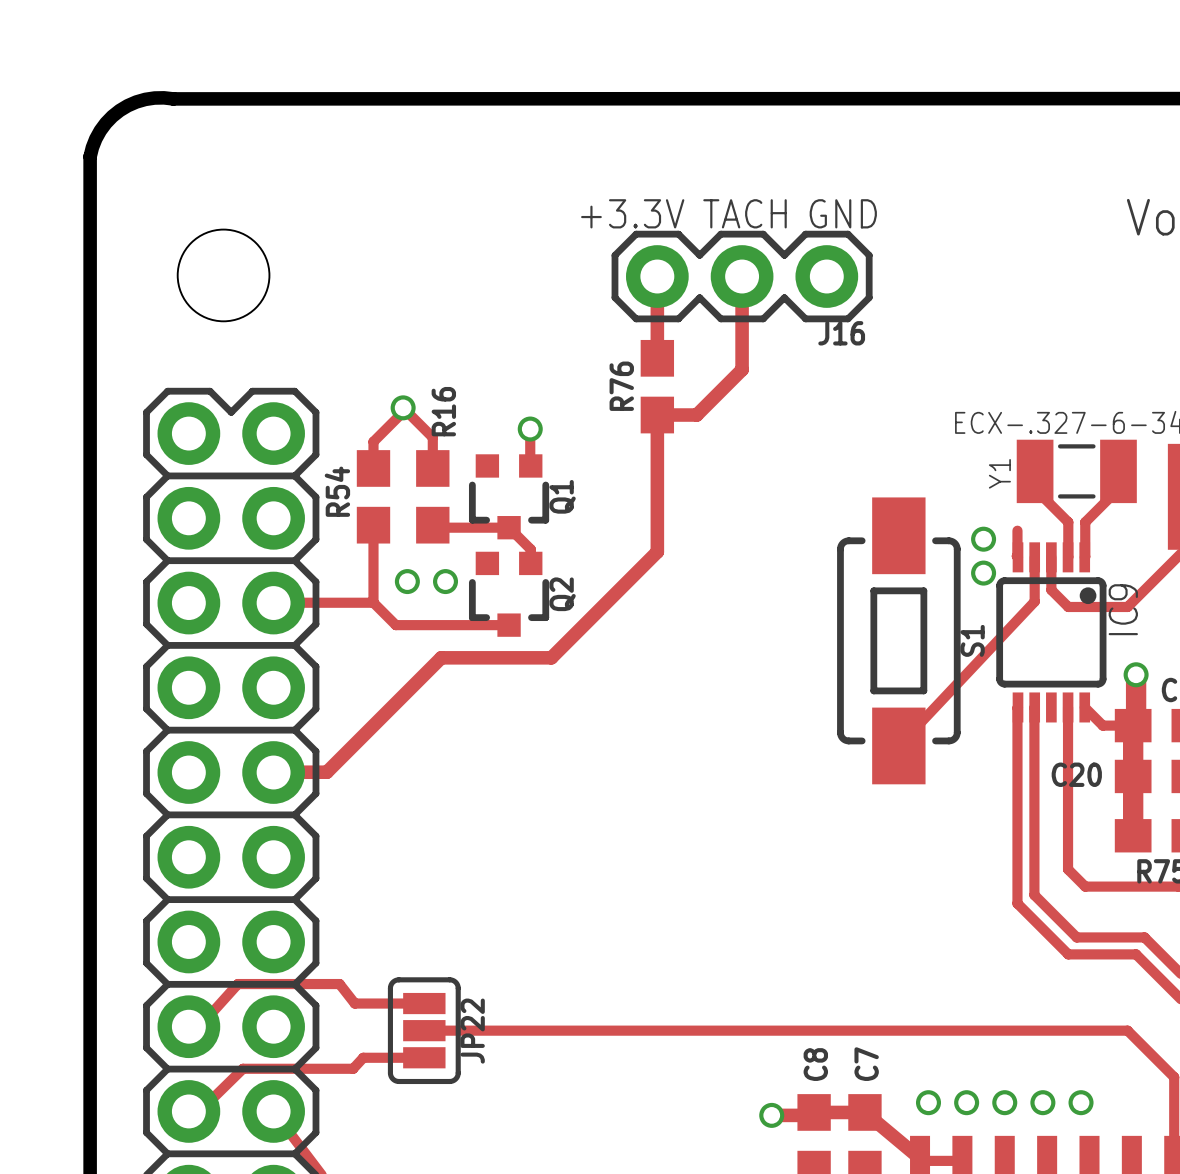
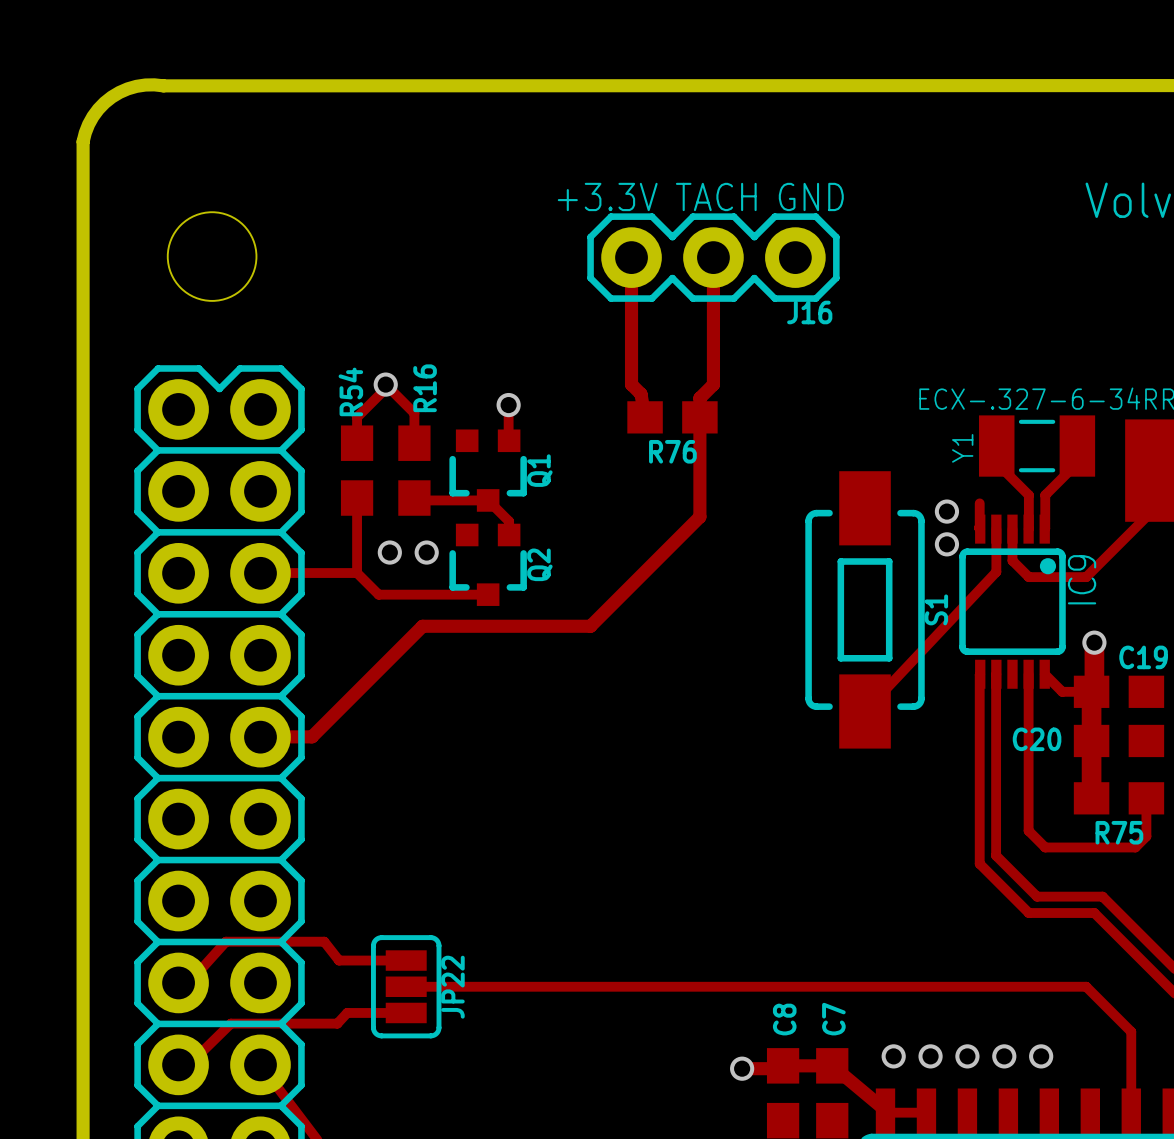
track: none -> (631, 336) (631, 384) (640, 394) (645, 417)
track: (742, 369) (696, 415) (657, 415) (657, 551) (551, 657) -> (713, 347) (713, 384) (699, 398) (699, 516) (590, 626) (529, 626)
R76 rotation: 0° (657, 386) -> 90° clockwise (672, 417)
R76 position: (657, 386) -> (672, 417)
R54 name position: R54 (337, 491) -> R54 (350, 391)

